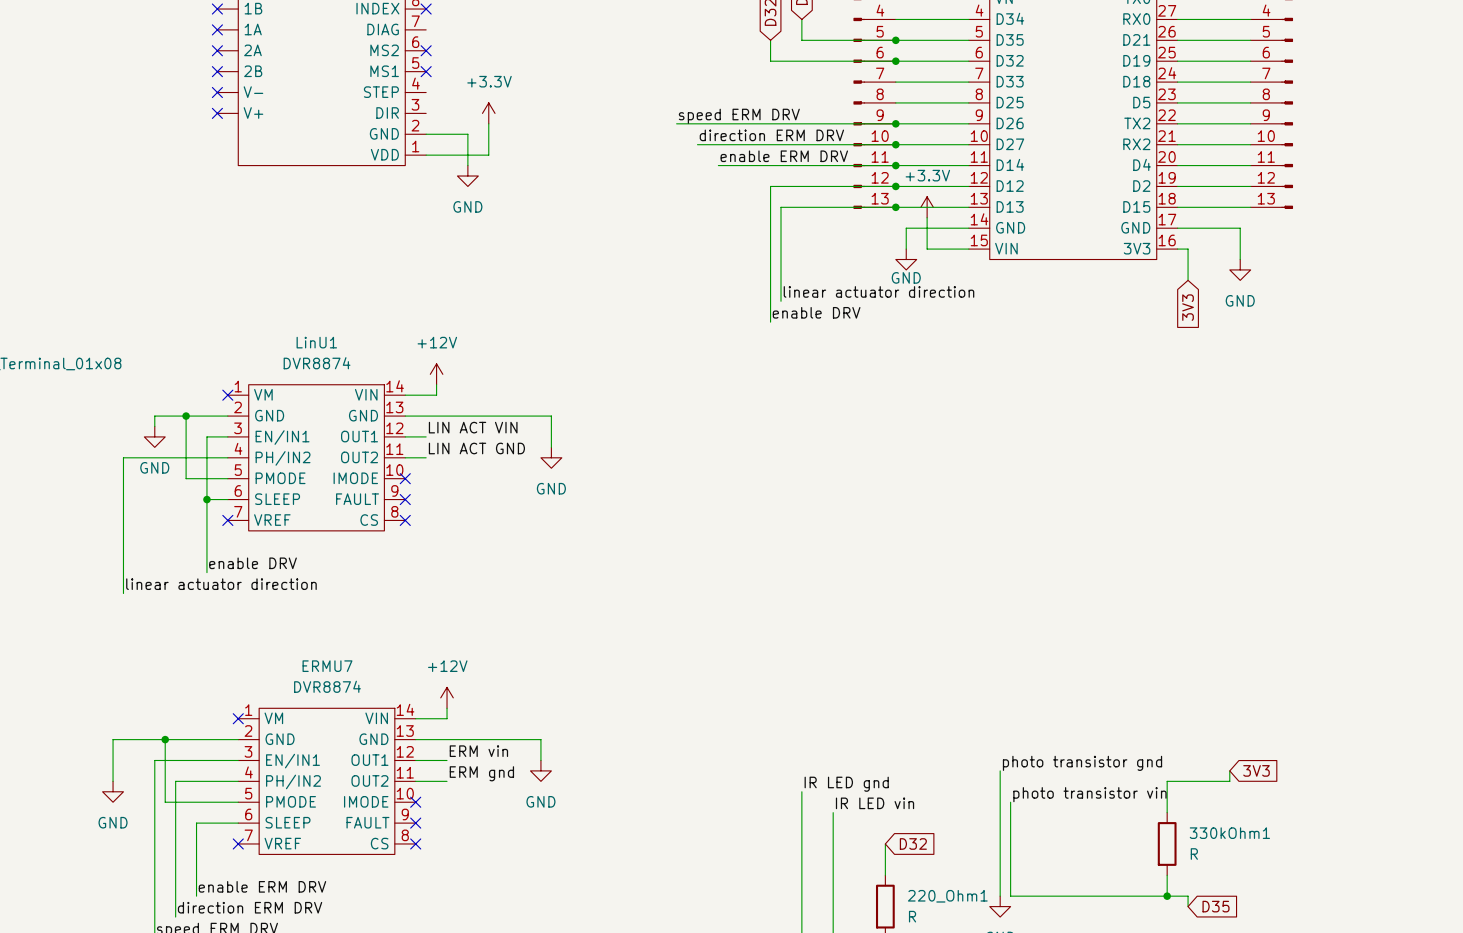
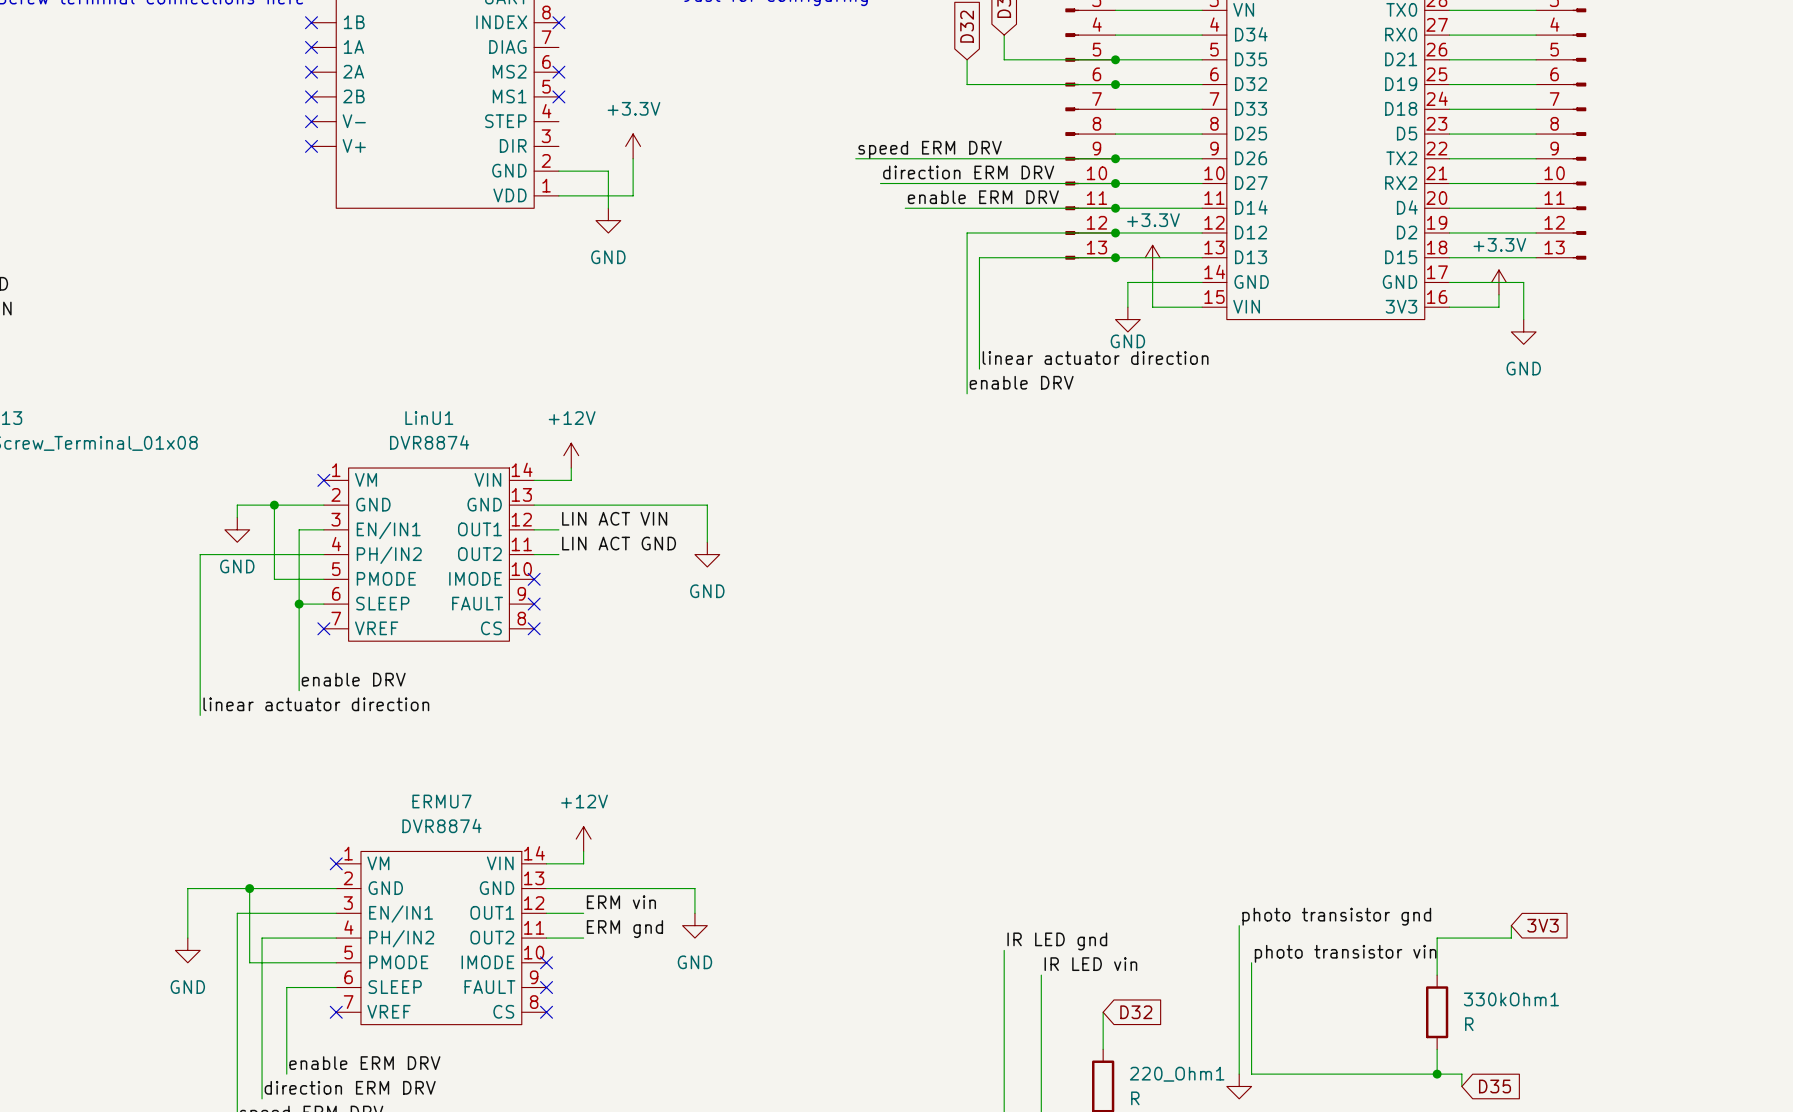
power symbol: none -> +3.3V (1498, 282)
wire: (1188, 249) (1188, 280) -> (1461, 307) (1498, 307) (1498, 294)
global label: 3V3 (1188, 307) -> none

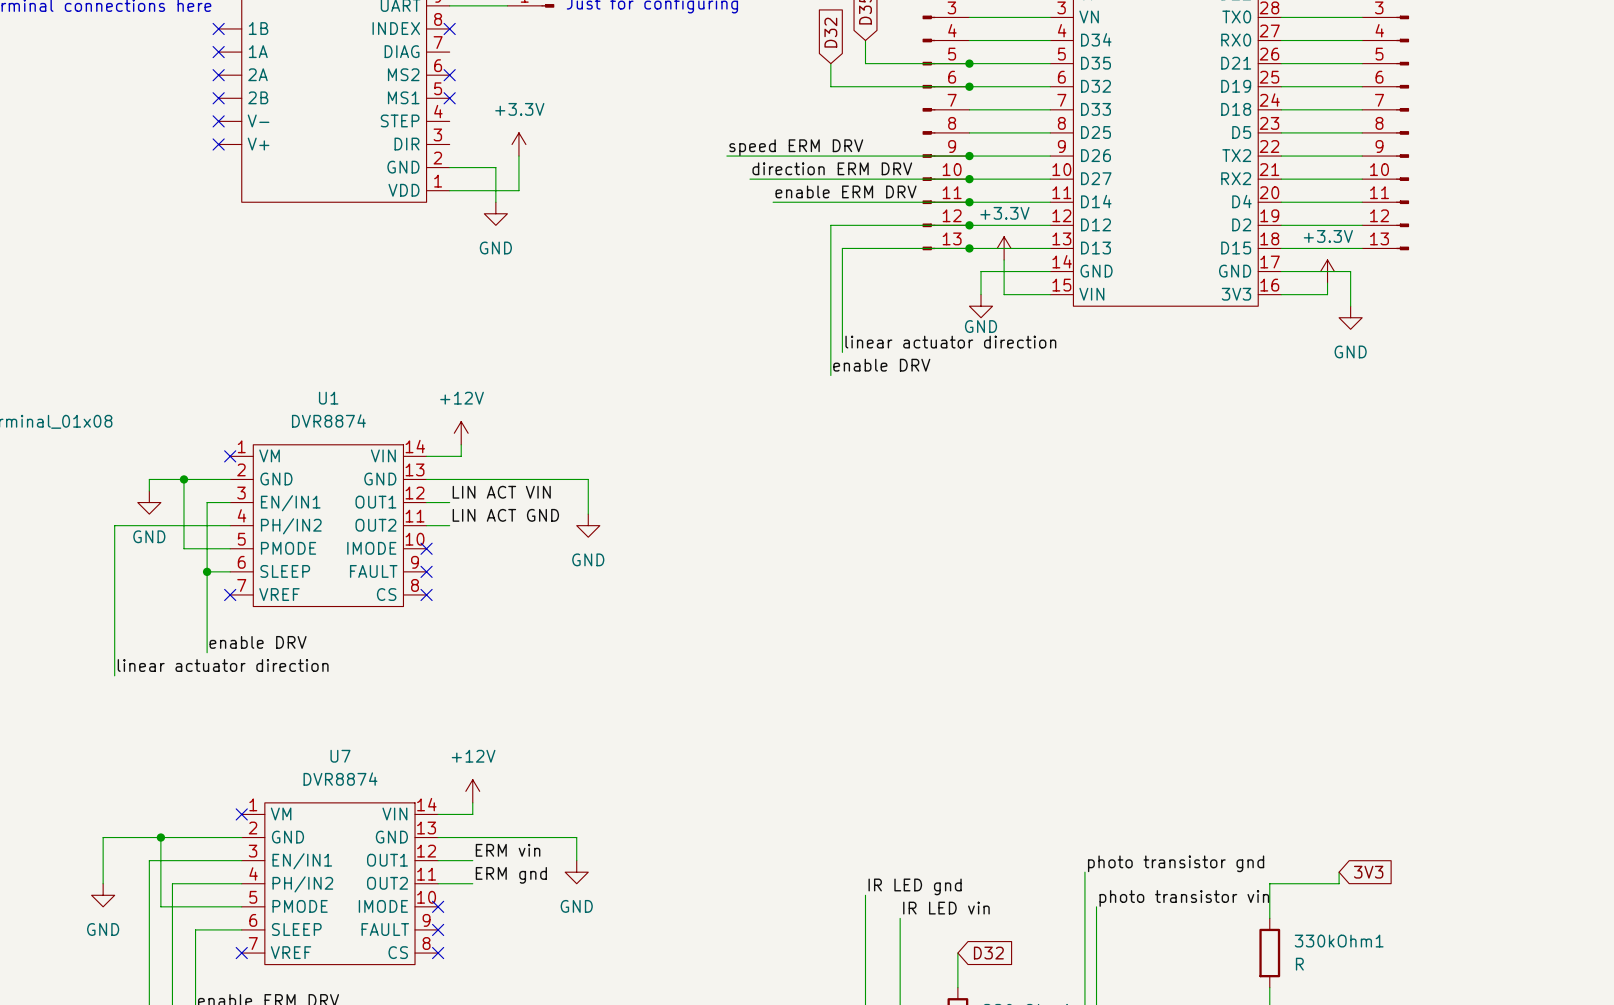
LinU1 name: LinU1 (429, 418) -> U1 (328, 398)
ERMU7 name: ERMU7 (441, 801) -> U7 (340, 756)

